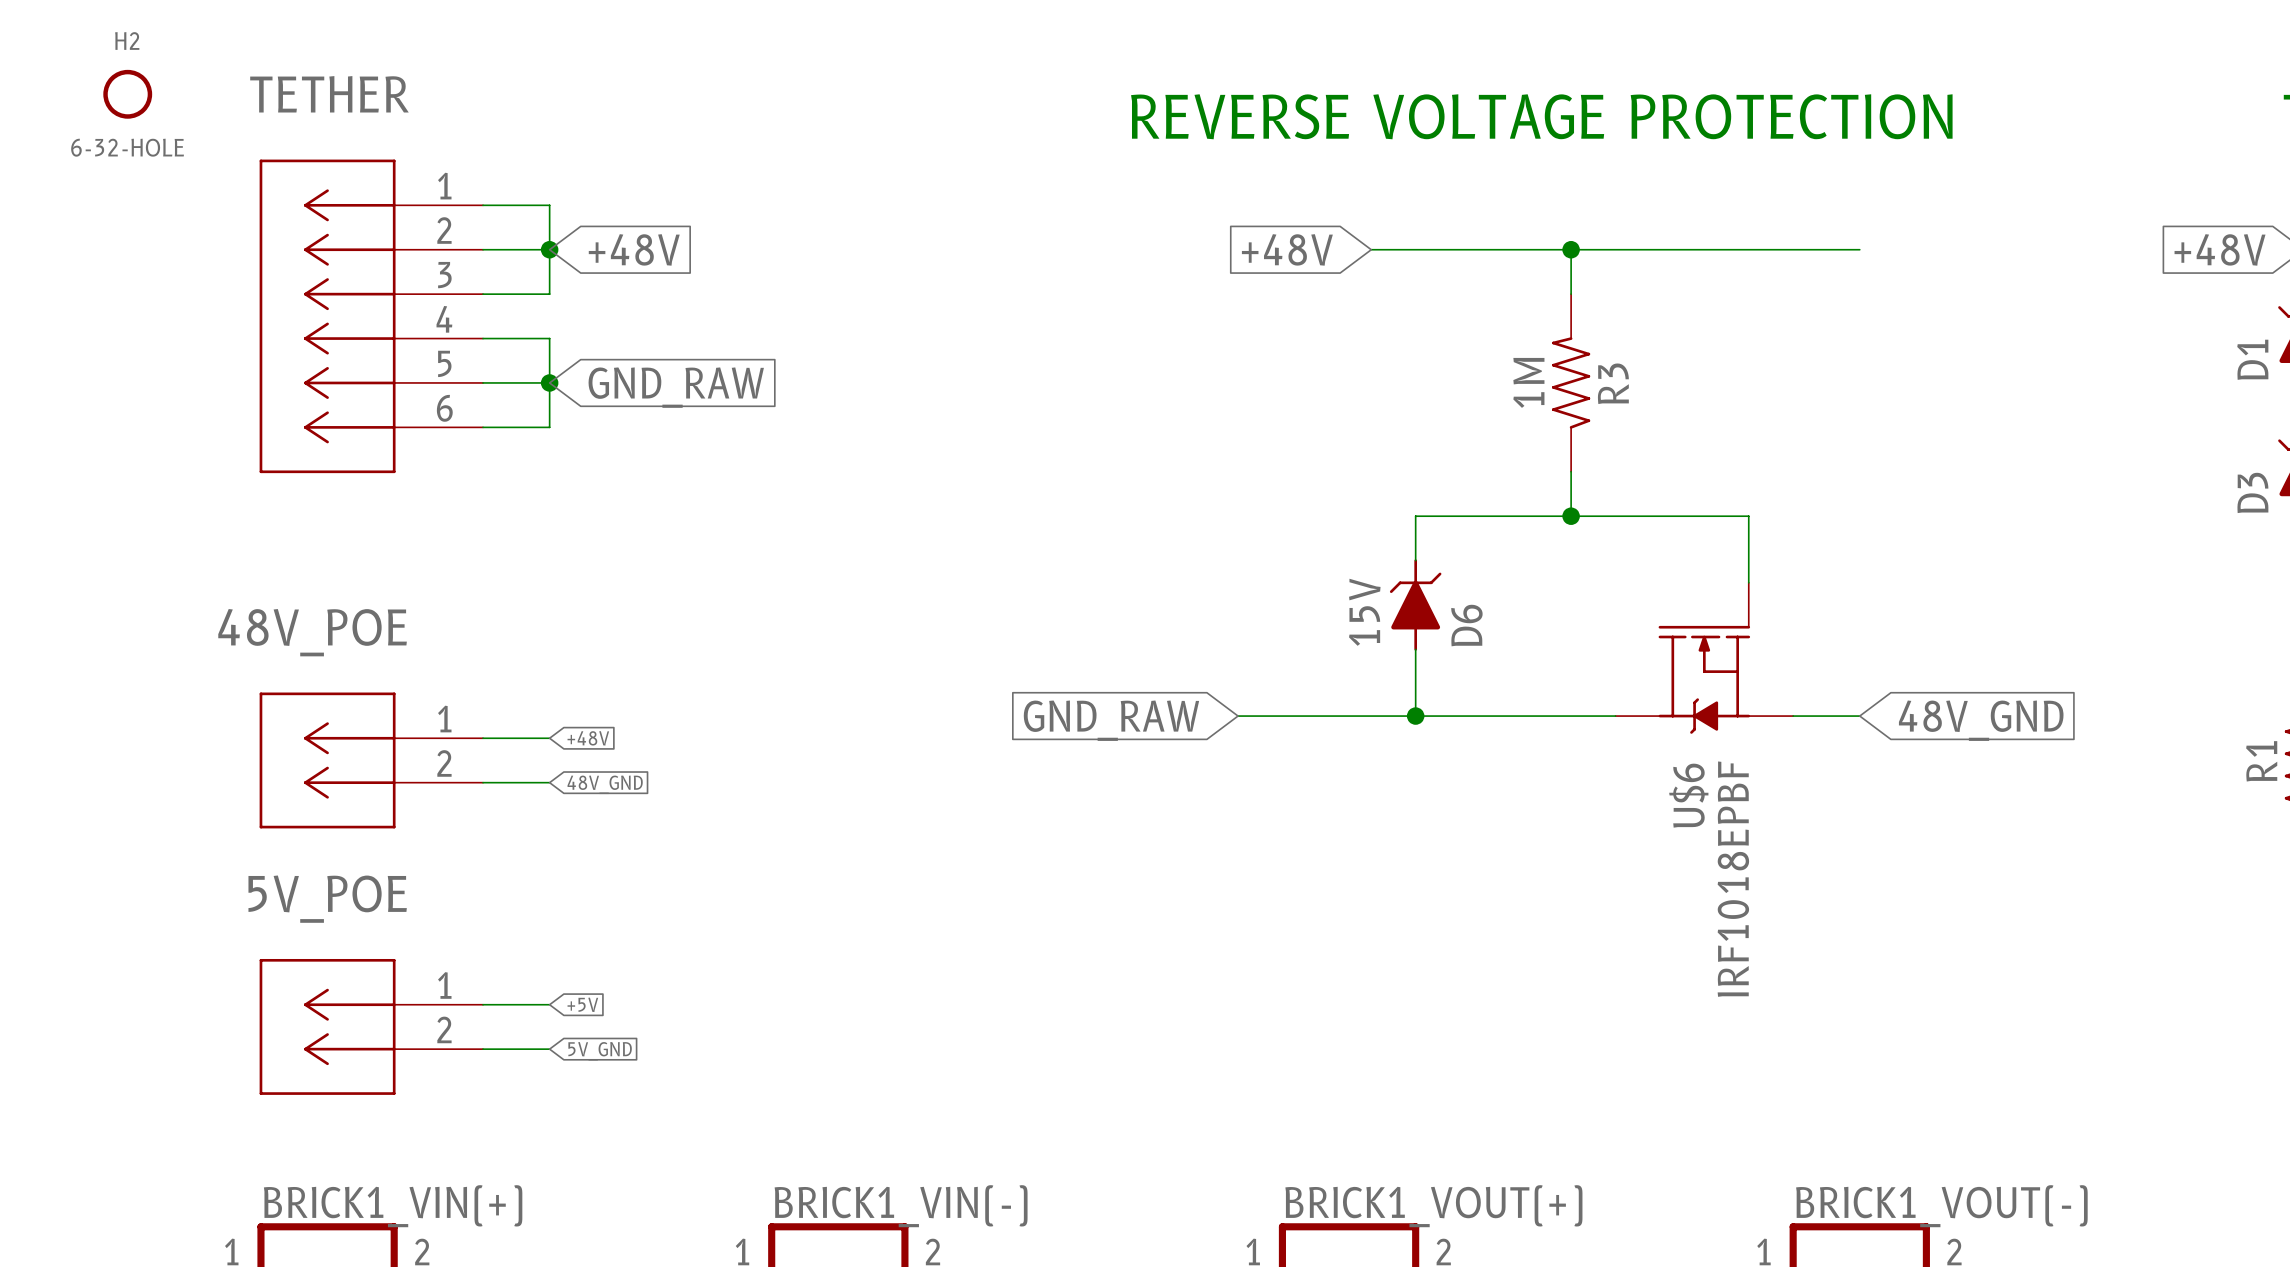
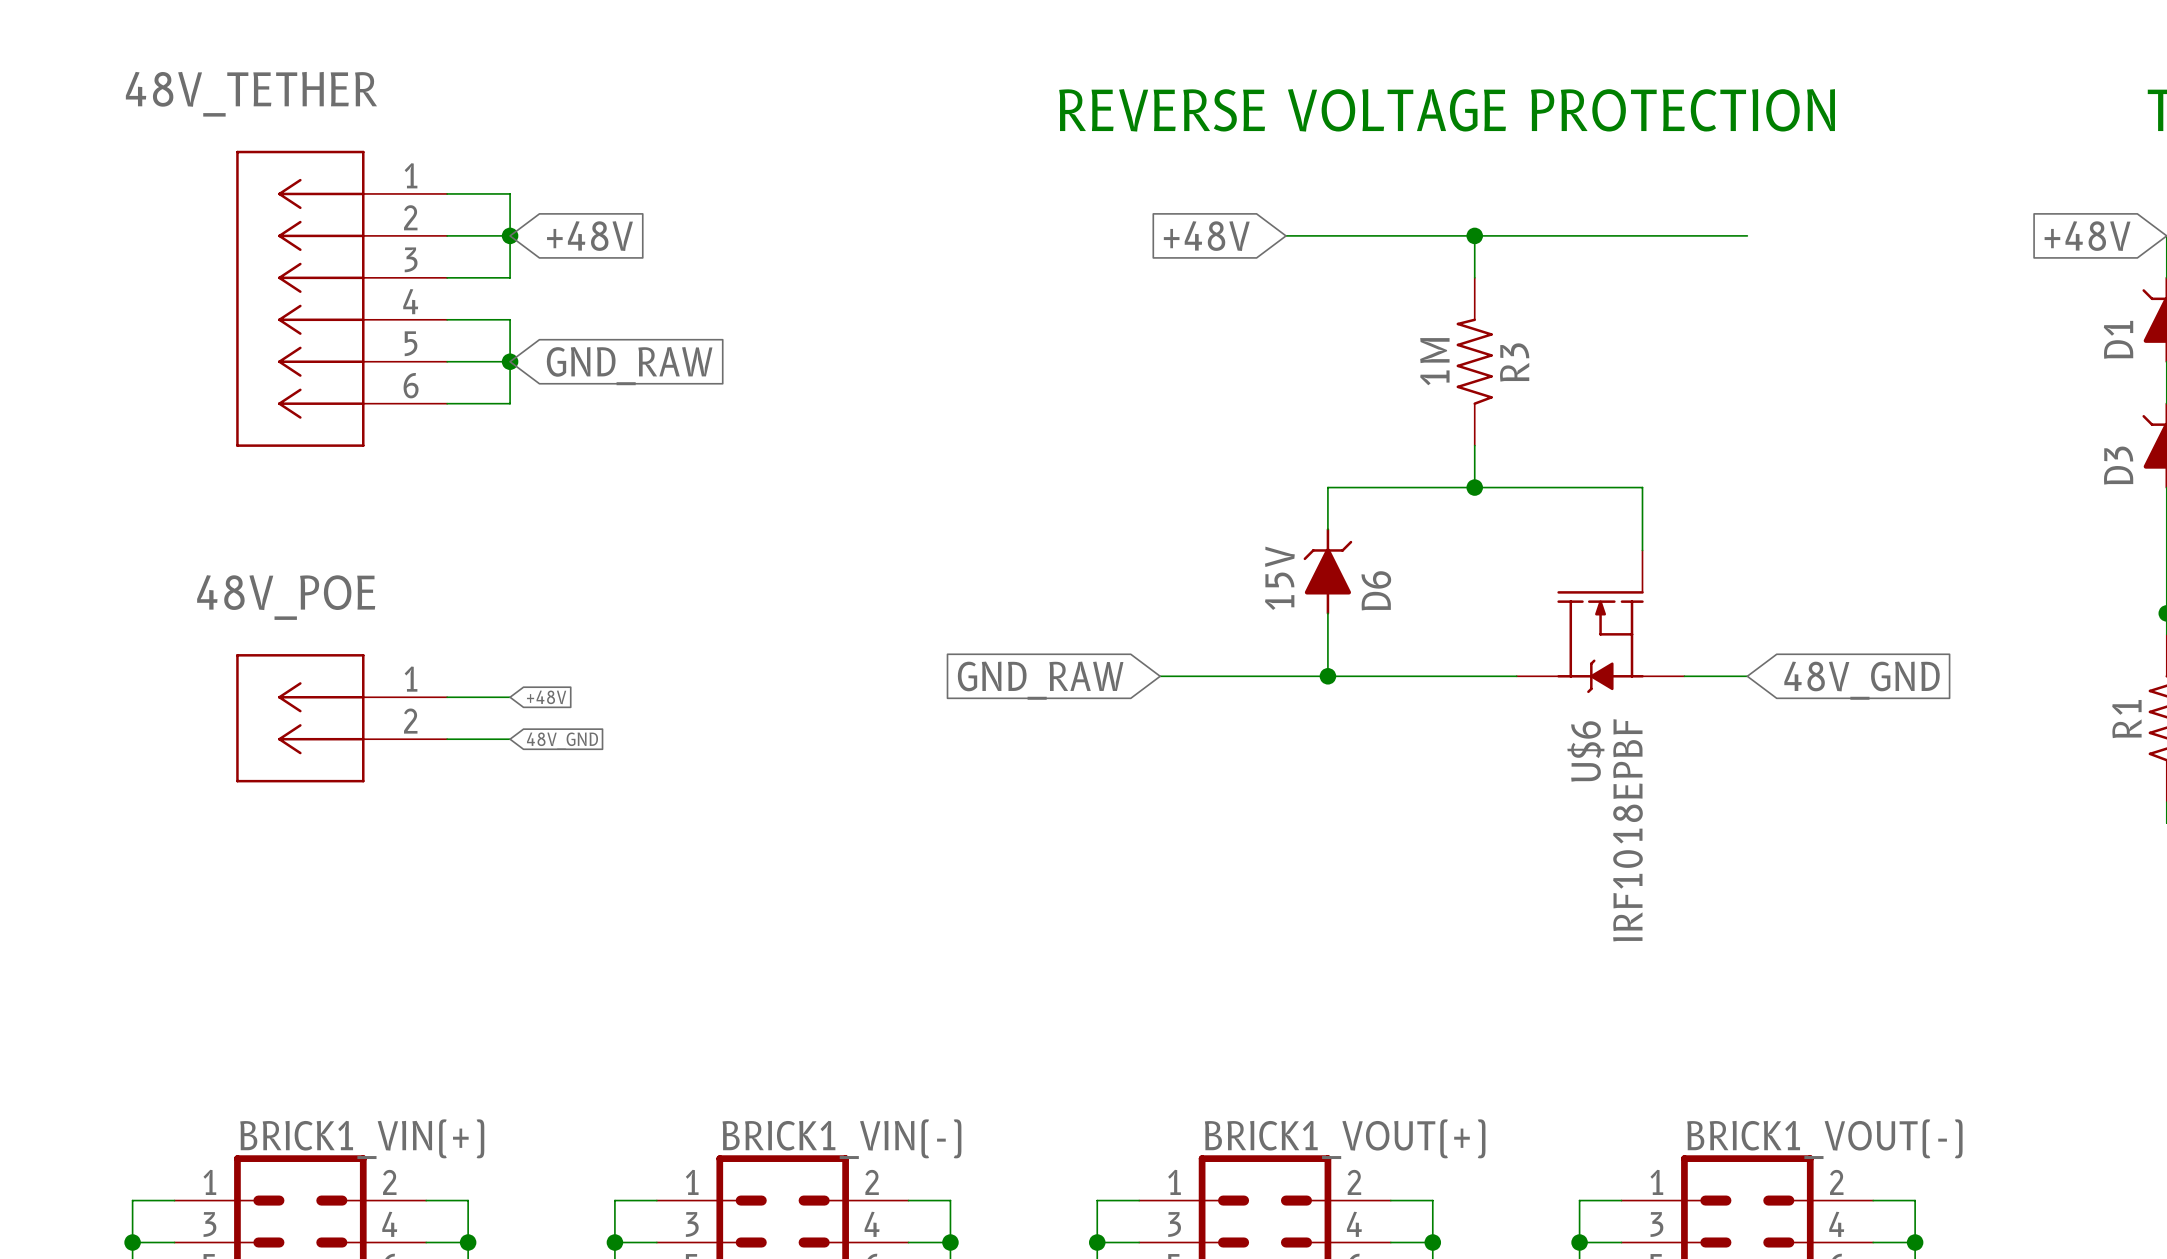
H2: 6-32-HOLE (127, 94) -> none
TETHER name: TETHER (329, 94) -> 48V_TETHER (251, 94)
wire: (483, 1004) (549, 1004) -> none
global label: +5V (582, 1004) -> none
5V_POE: (371, 1026) -> none
wire: (483, 1049) (549, 1049) -> none
global label: 5V_GND (600, 1051) -> none

